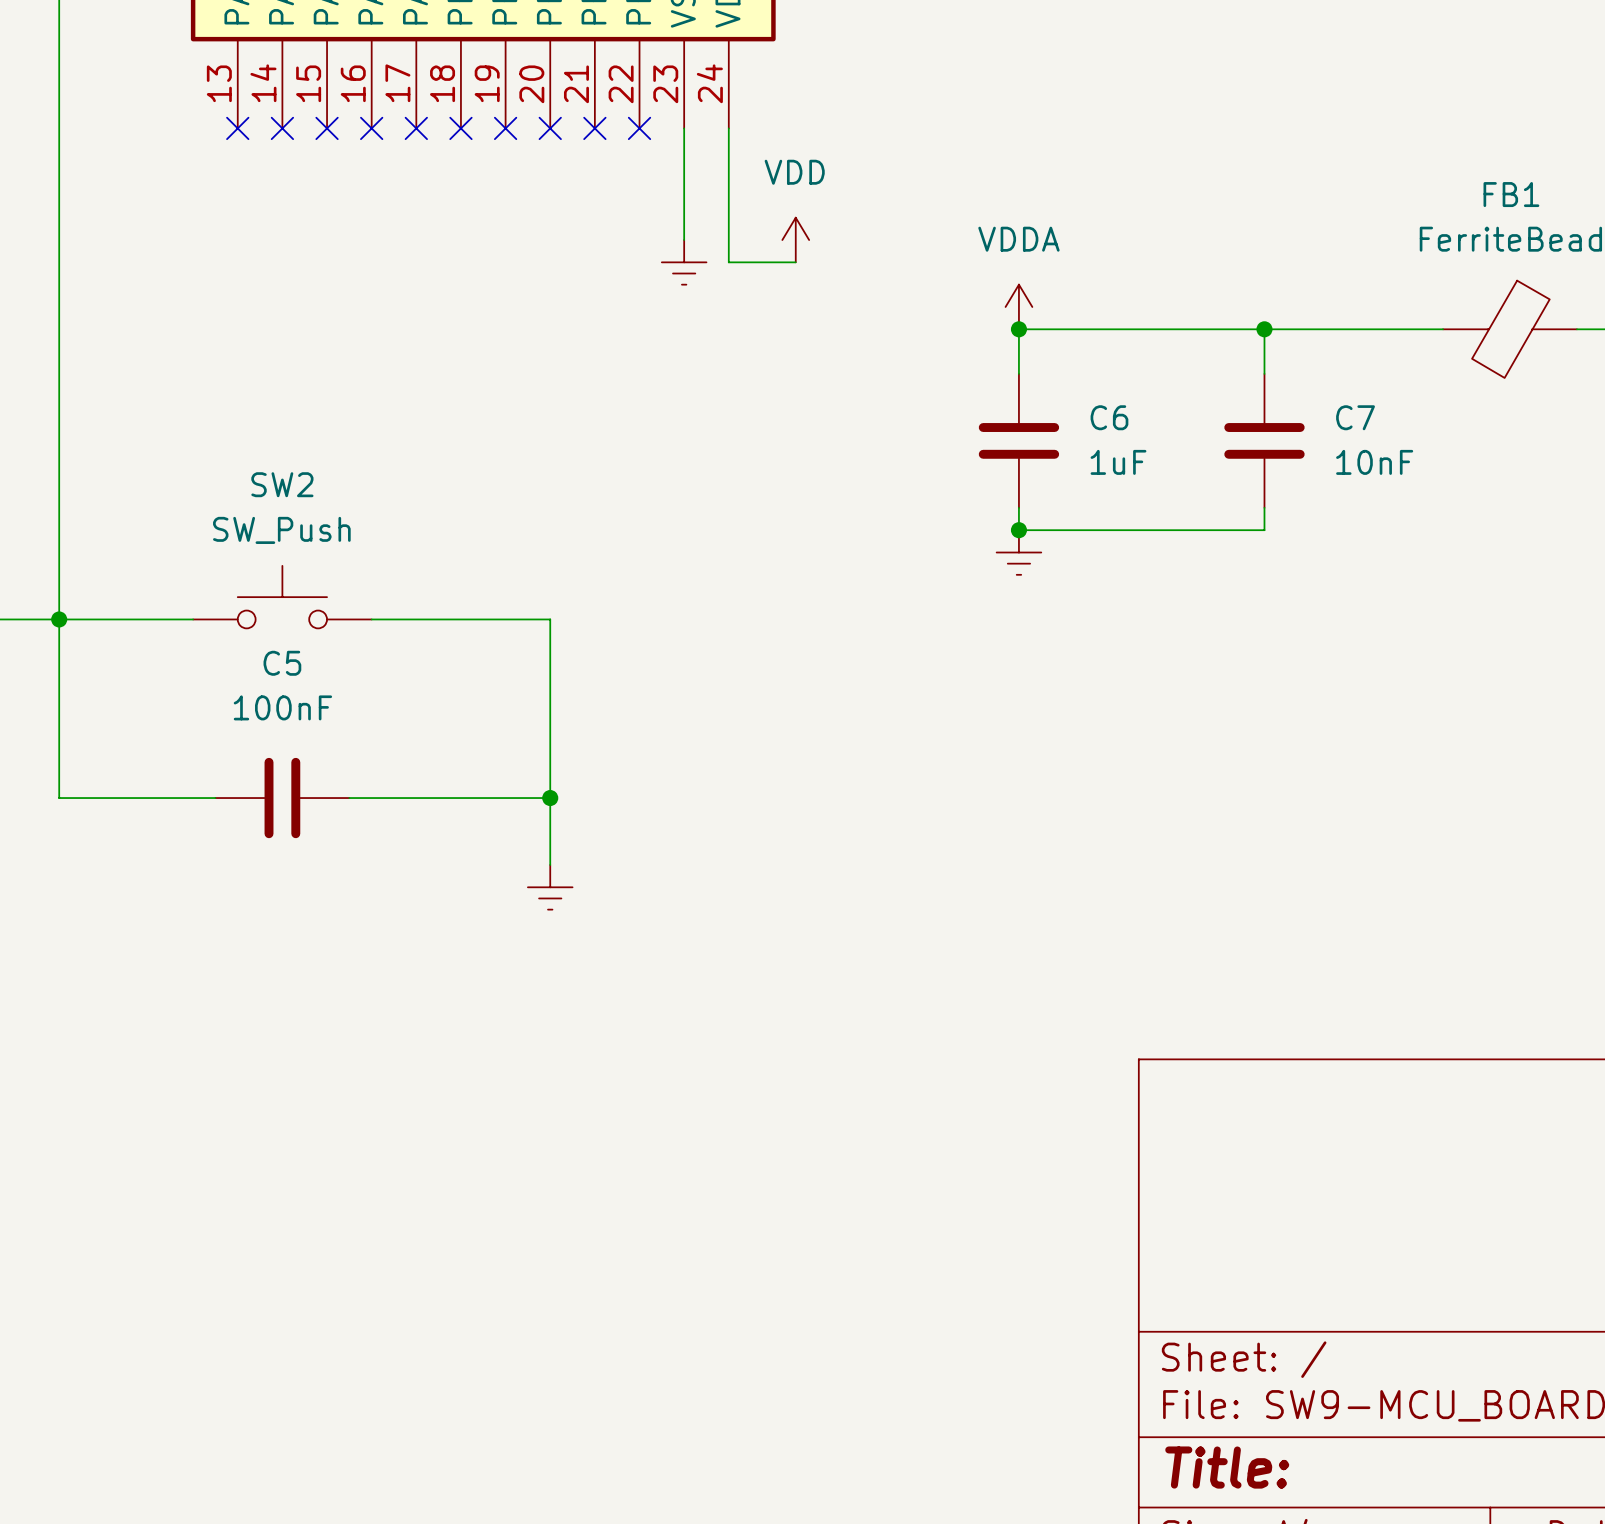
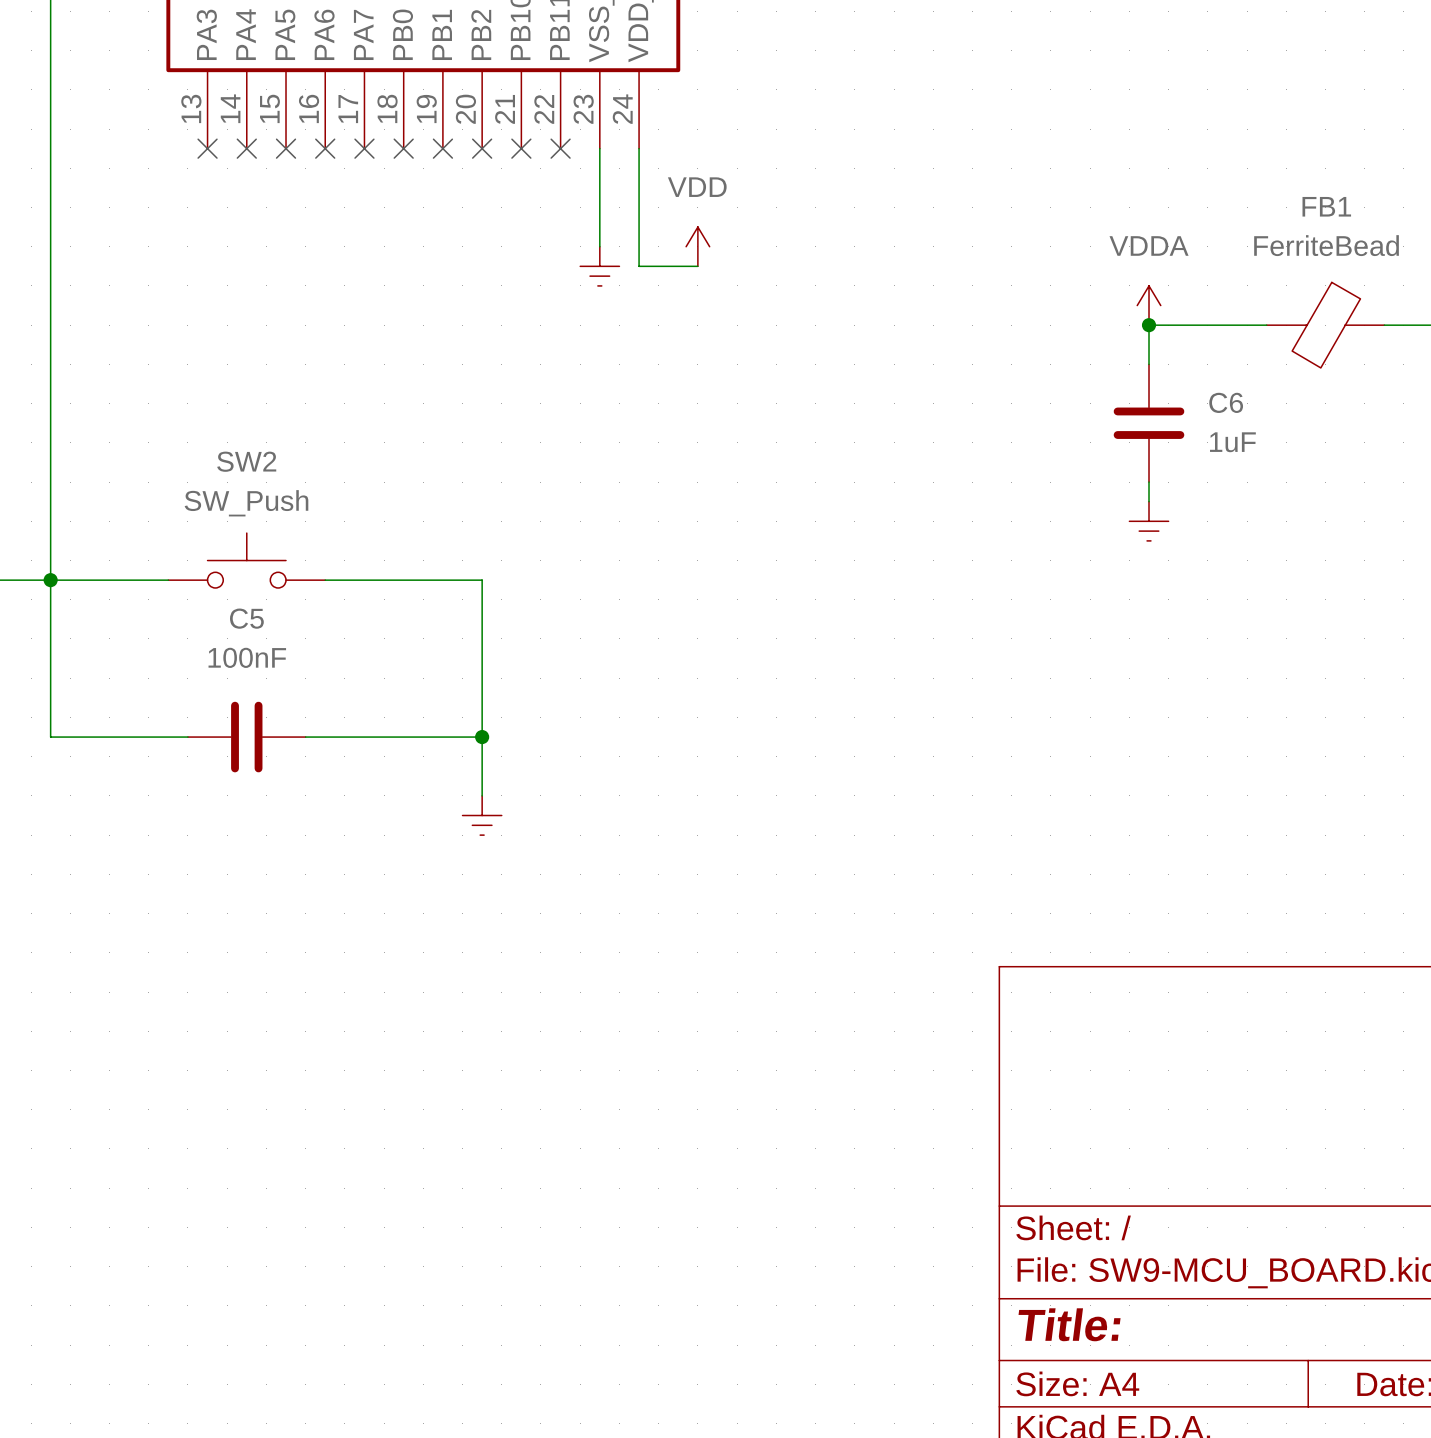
power symbol position: VDDA (1018, 306) -> VDDA (1149, 305)
junction: (1018, 329) -> none
wire: (1264, 329) (1264, 373) -> none
junction position: (1264, 329) -> (1149, 325)
wire: (1309, 329) (1018, 329) (1018, 373) -> (1149, 325) (1149, 364)
C6 position: (1018, 440) -> (1149, 423)
C7: 10nF (1264, 440) -> none
wire: (1018, 507) (1018, 530) (1264, 530) (1264, 507) -> none
wire: none -> (1149, 482) (1149, 501)
junction: (1018, 530) -> none
power symbol position: (1018, 552) -> (1149, 521)

